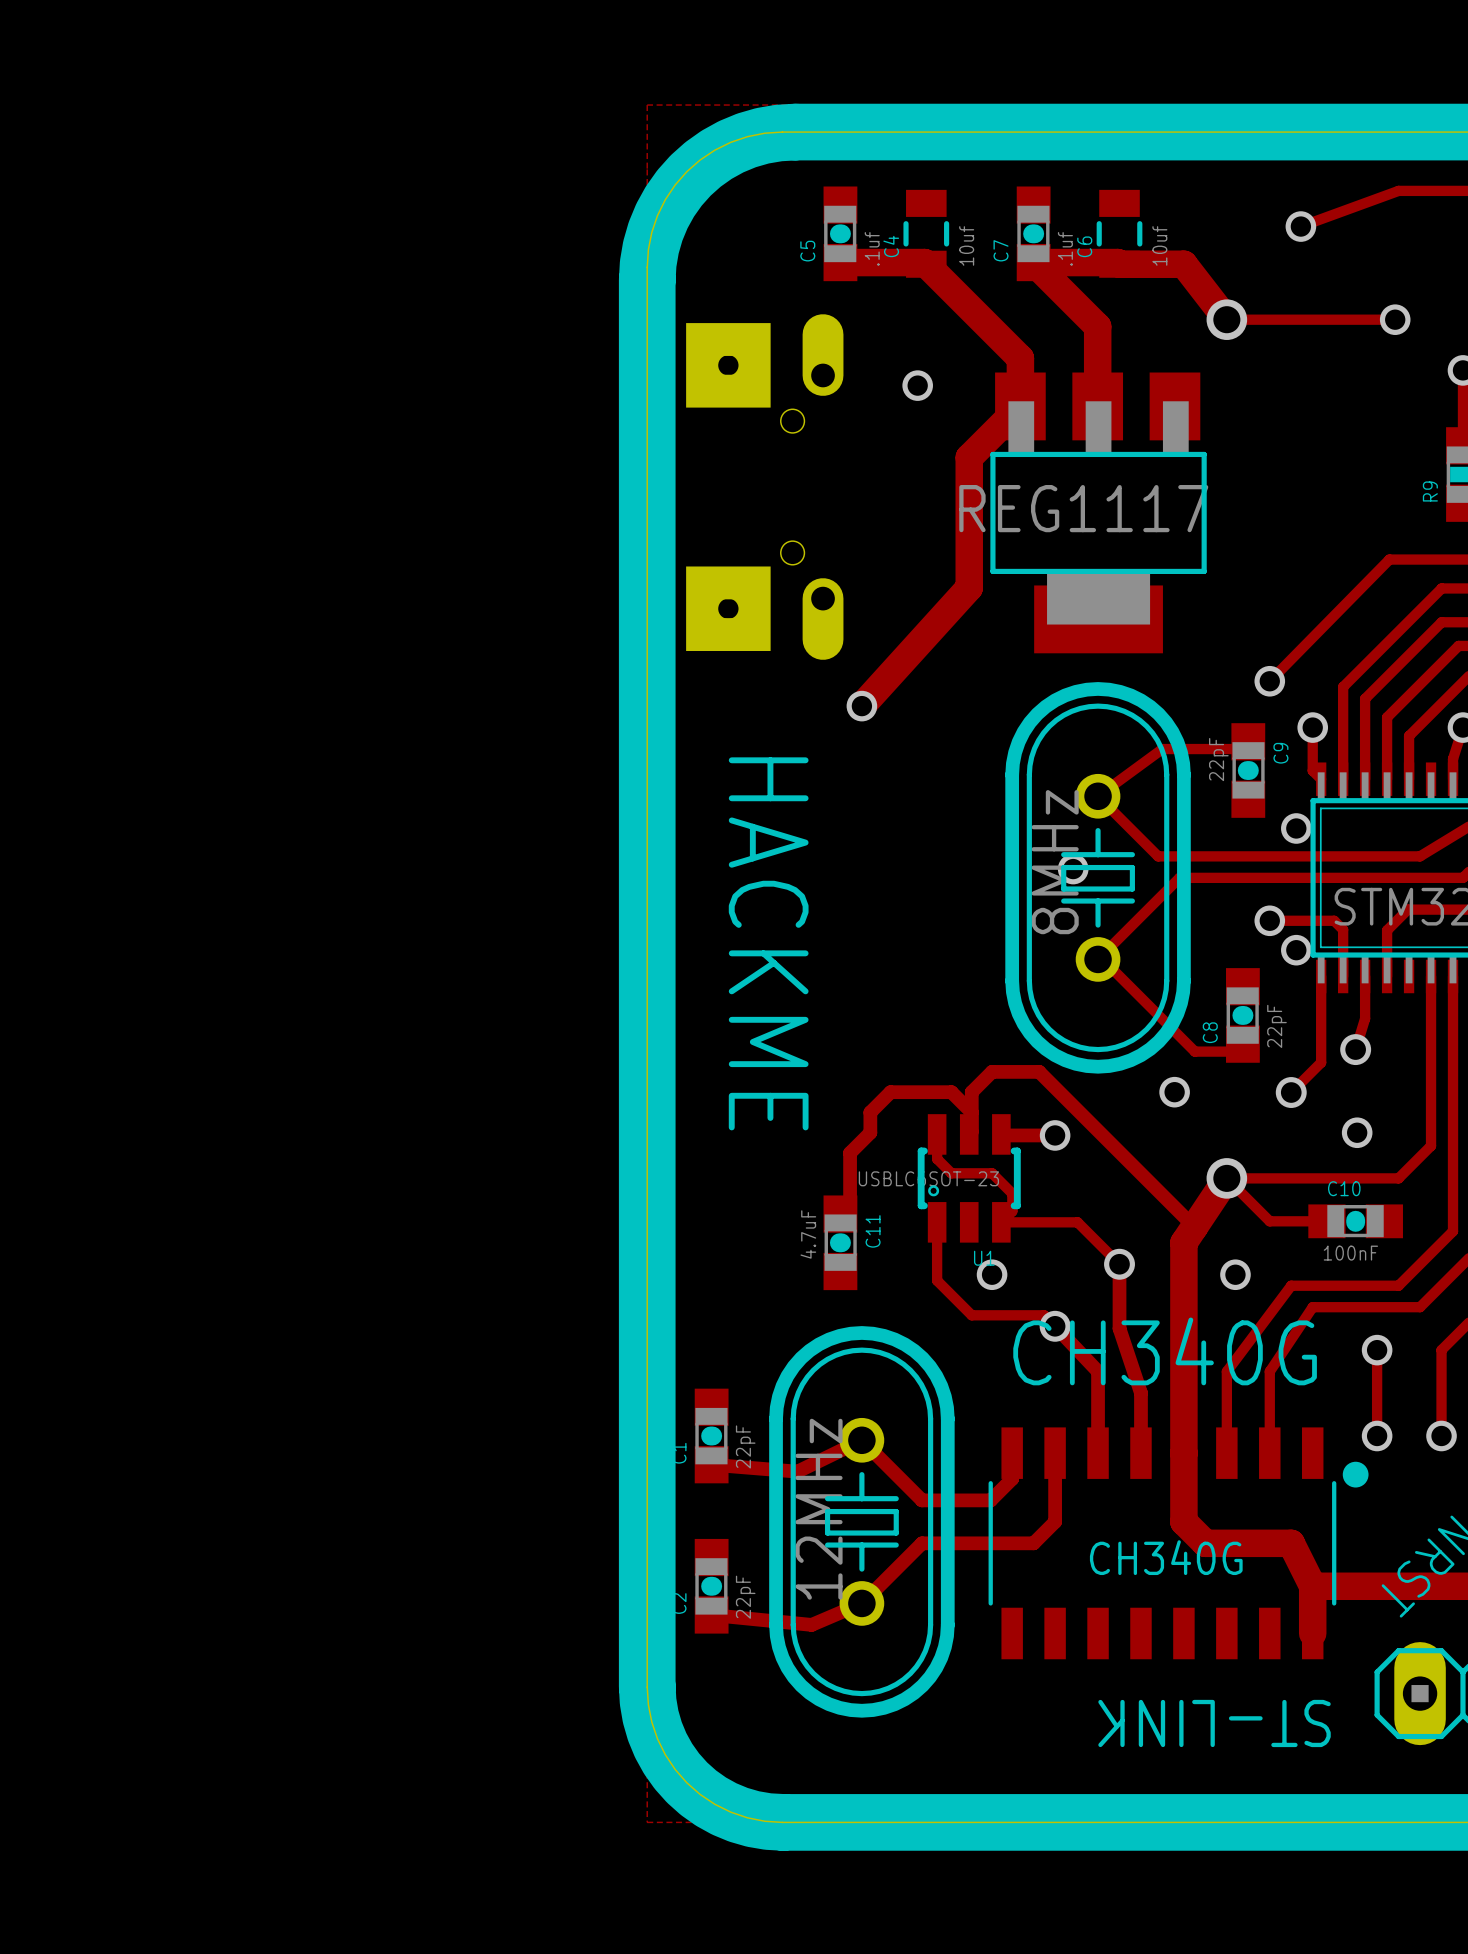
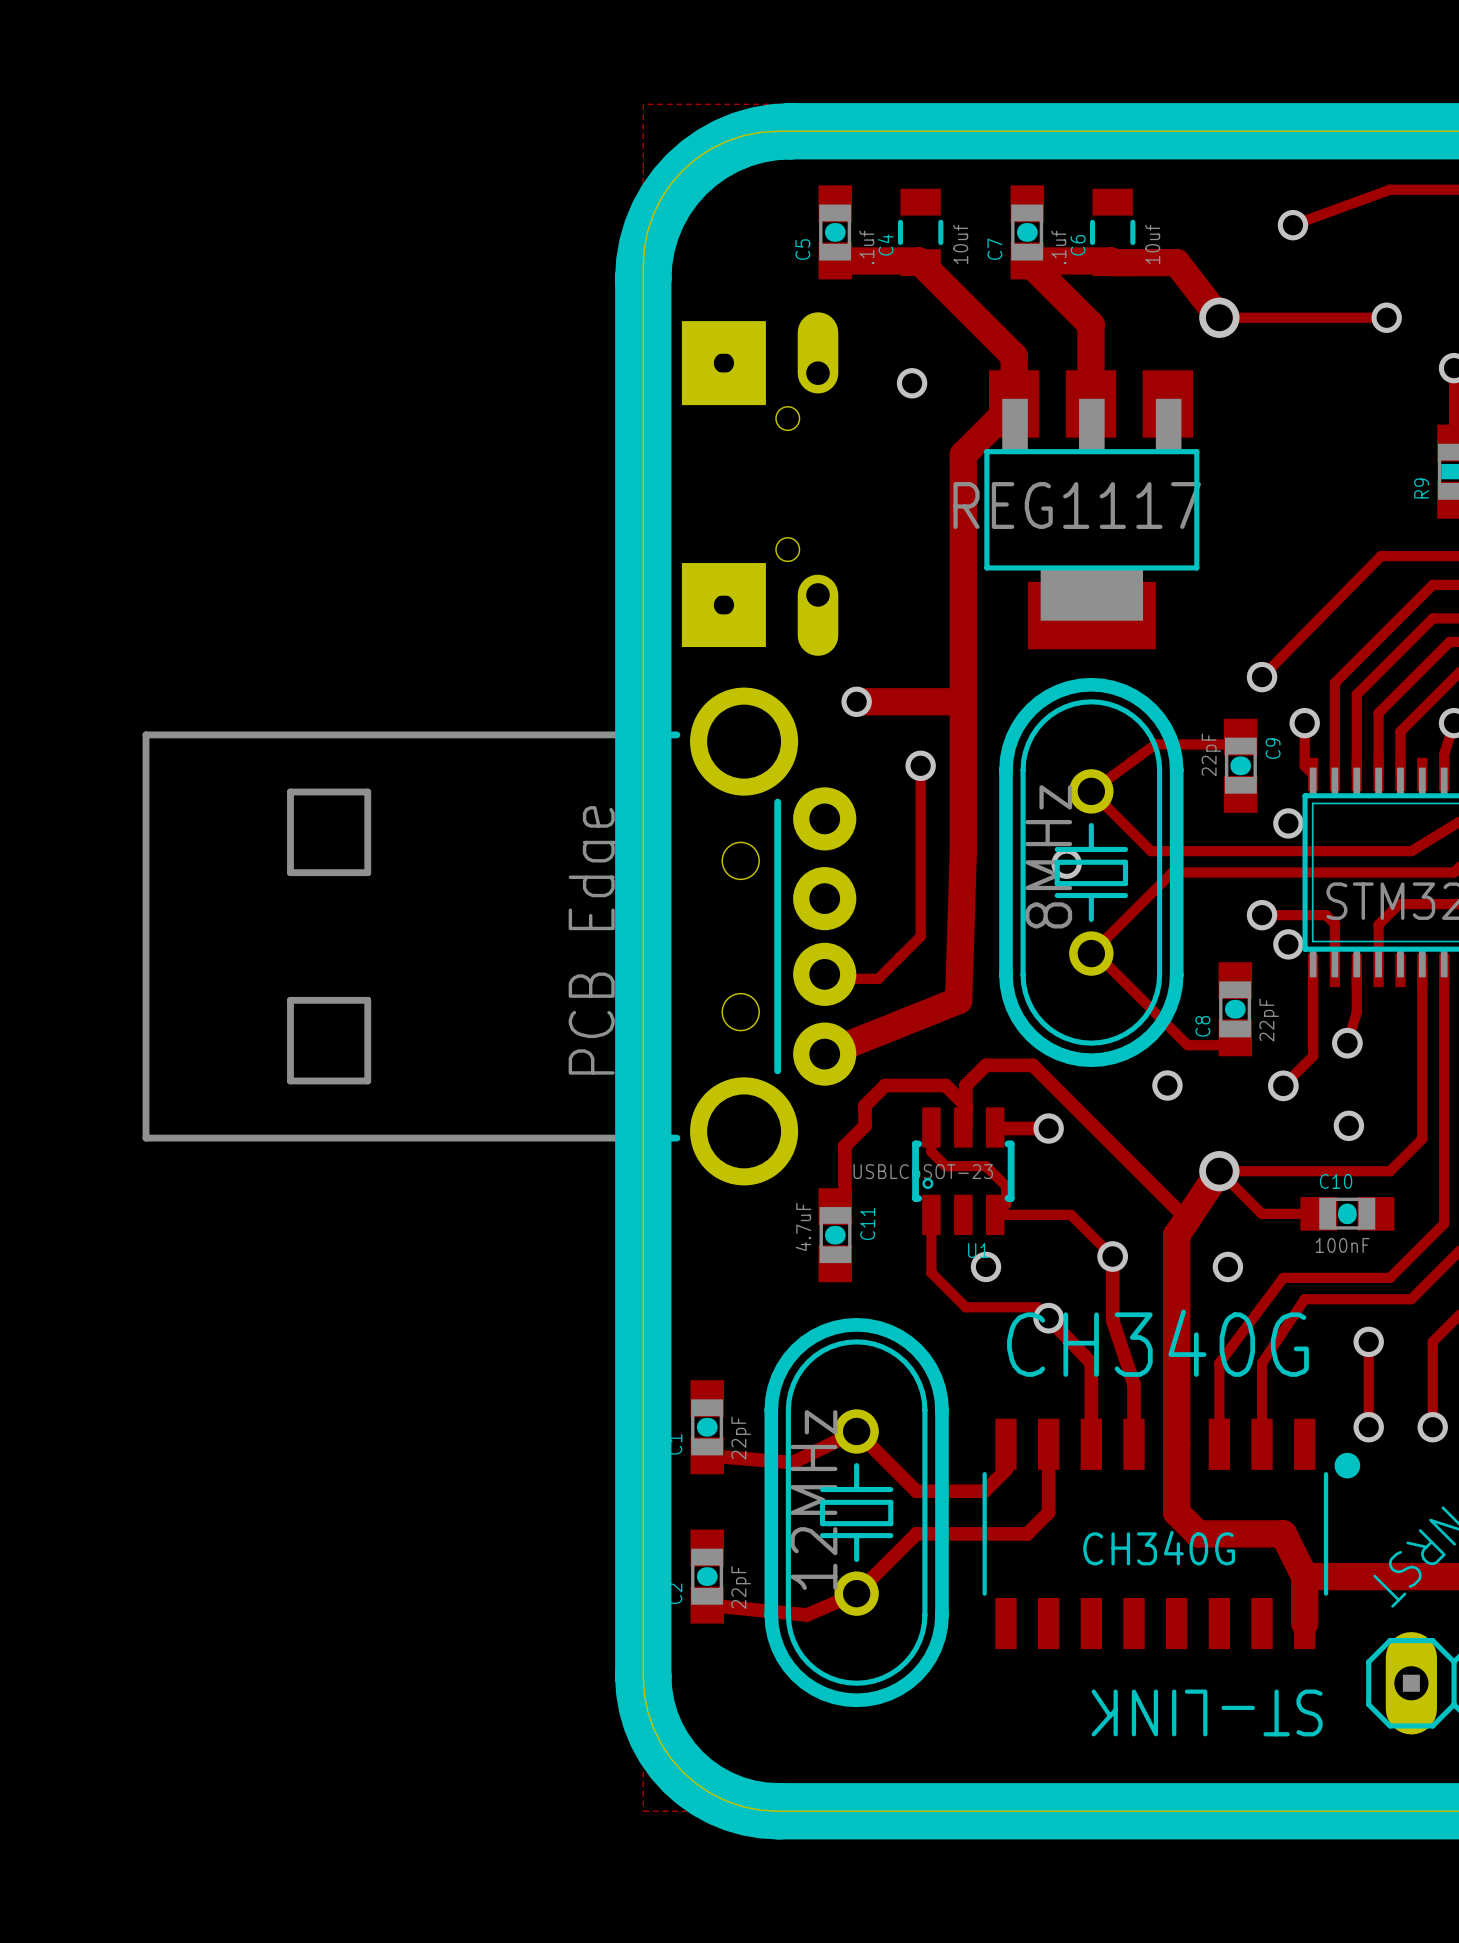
track: (969, 587) (861, 706) -> (963, 701) (856, 701)
track: none -> (963, 584) (963, 851) (958, 1000) (824, 1054)
track: none -> (920, 765) (920, 936) (878, 978) (835, 978) (824, 974)
via: none -> (920, 765)
part: none -> (499, 936)
text: HACKME (768, 943) -> none

